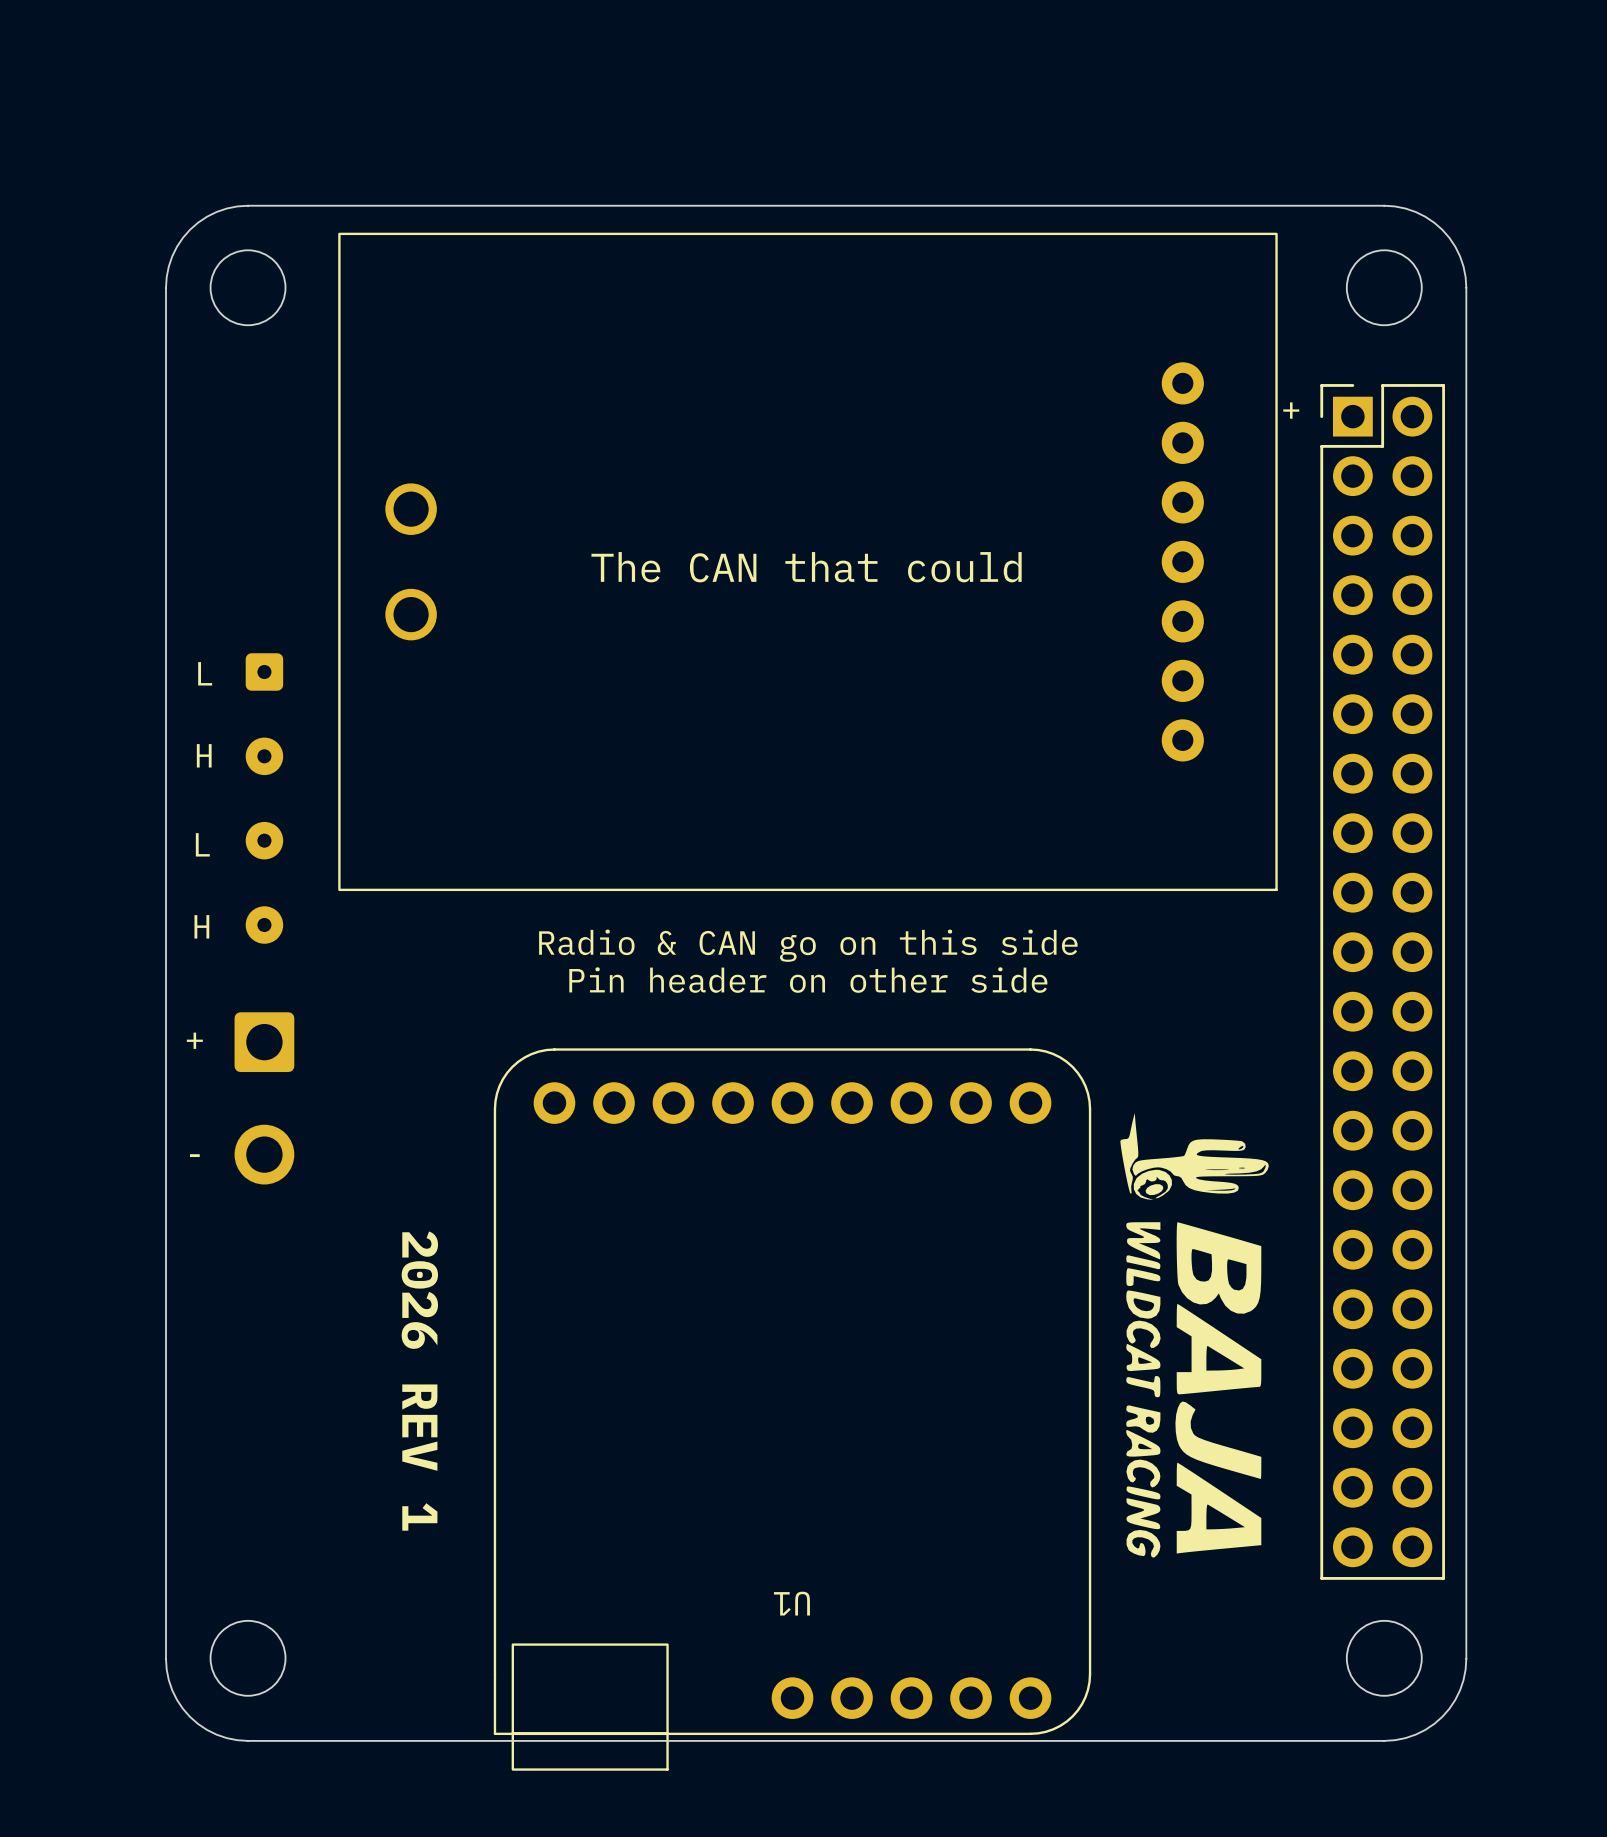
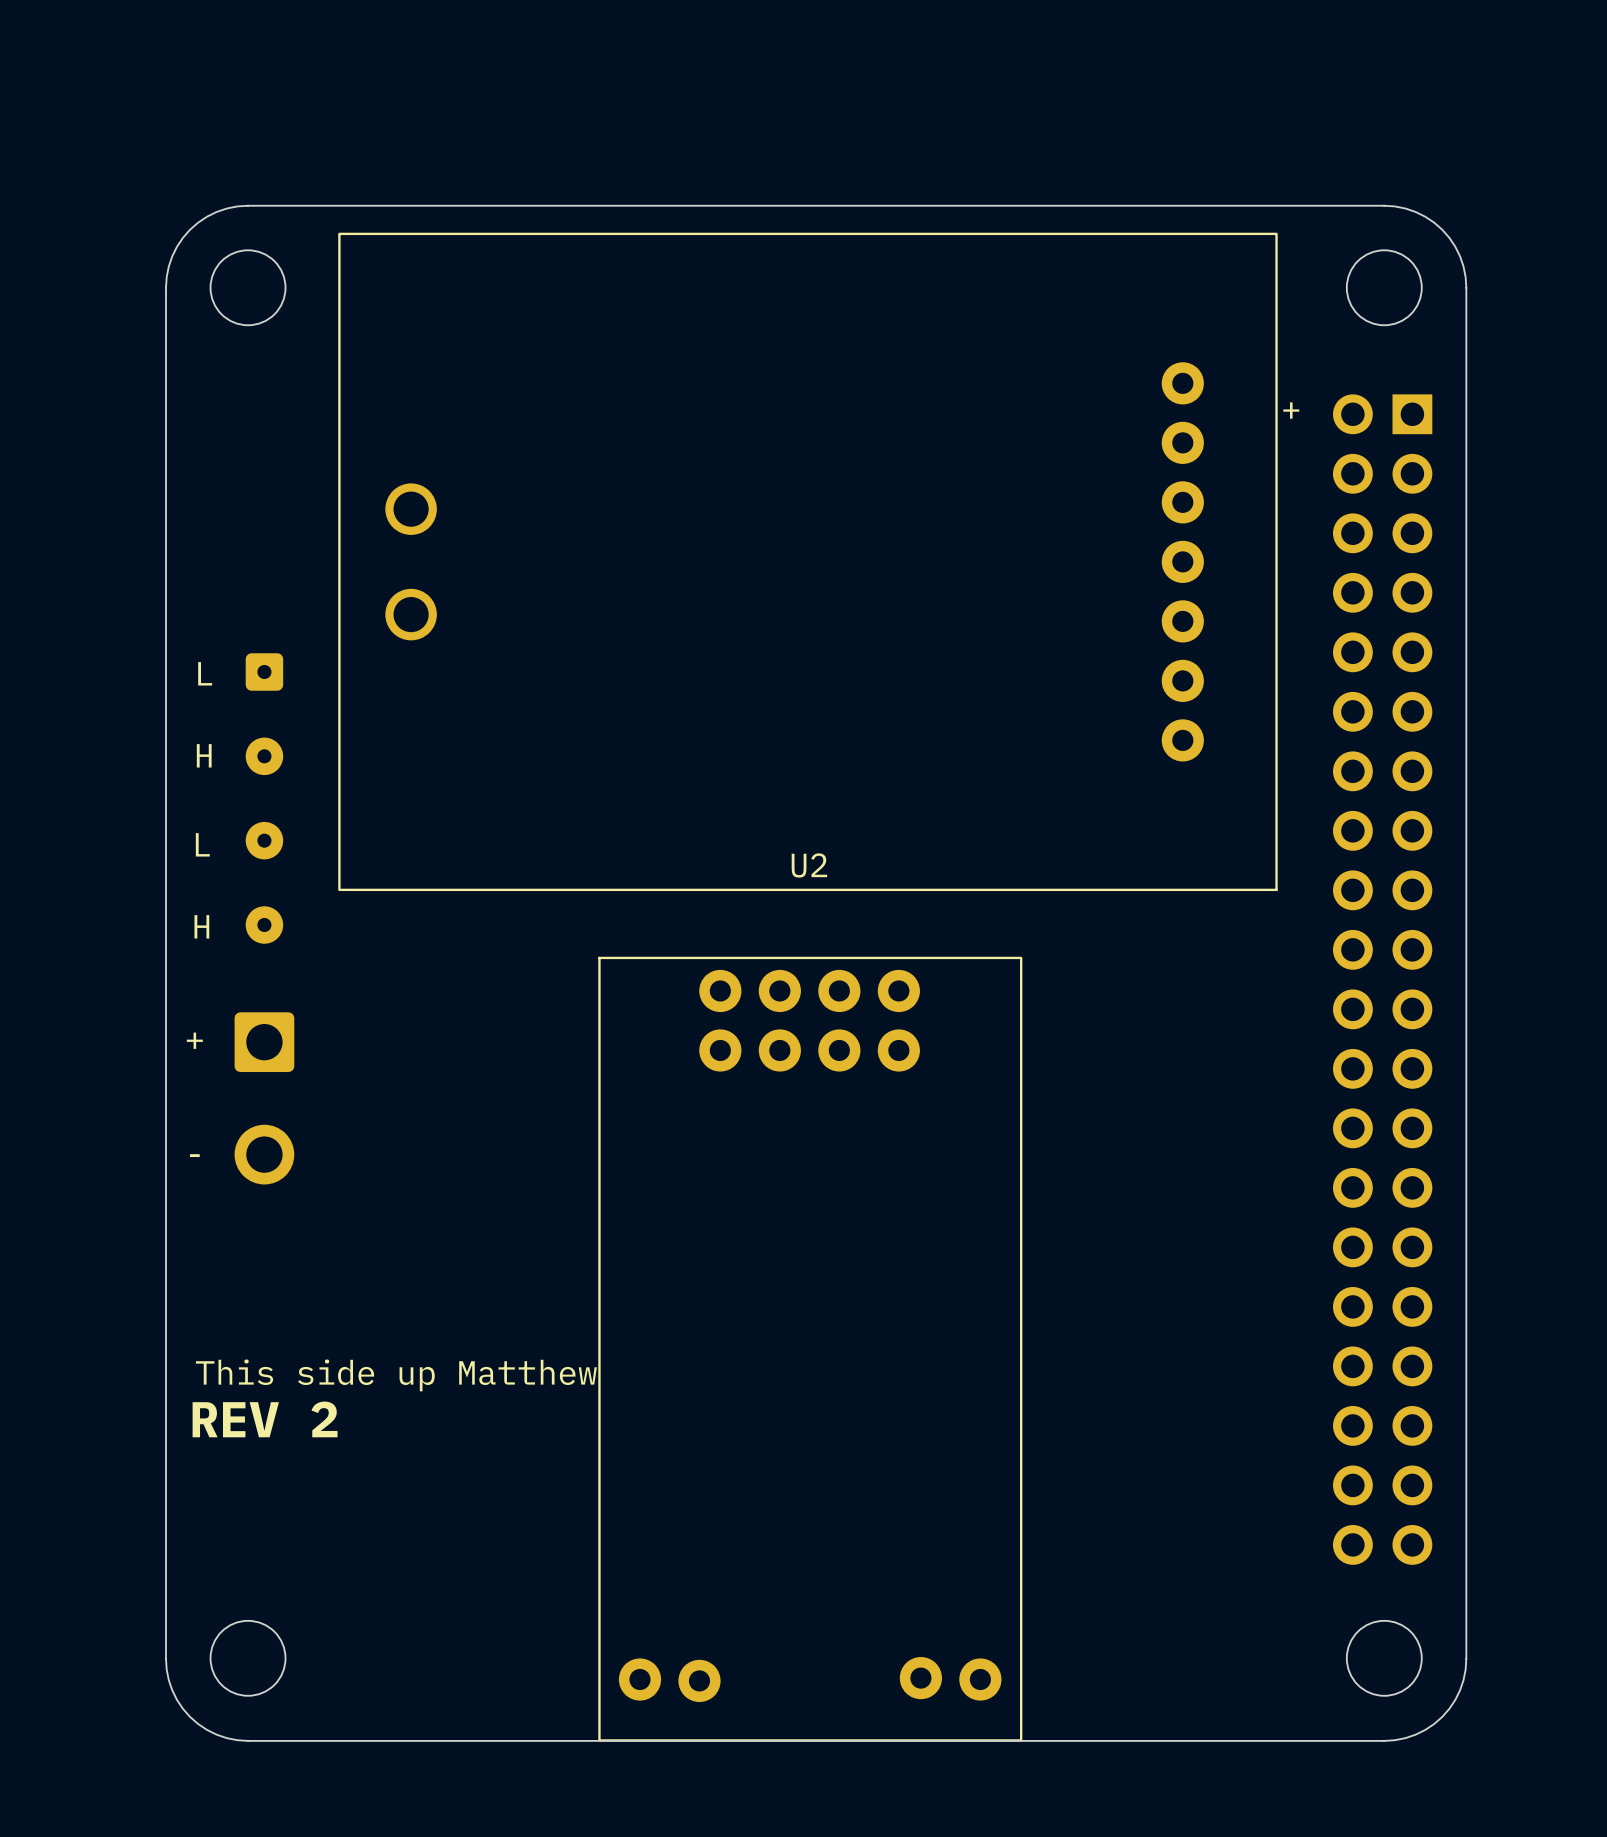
text: The CAN that could (806, 567) -> none
text: Radio & CAN go on this side (808, 945) -> none
text: Pin header on other side (808, 980) -> none
part side: top (1382, 981) -> bottom (1382, 979)
drawing: [1120, 1113, 1269, 1558] -> none
U2: none -> (810, 1349)
text: none -> This side up Matthew (396, 1375)
text: 2026 REV 1 (419, 1381) -> none
U1: (792, 1409) -> none
text: none -> REV 2 (265, 1419)

